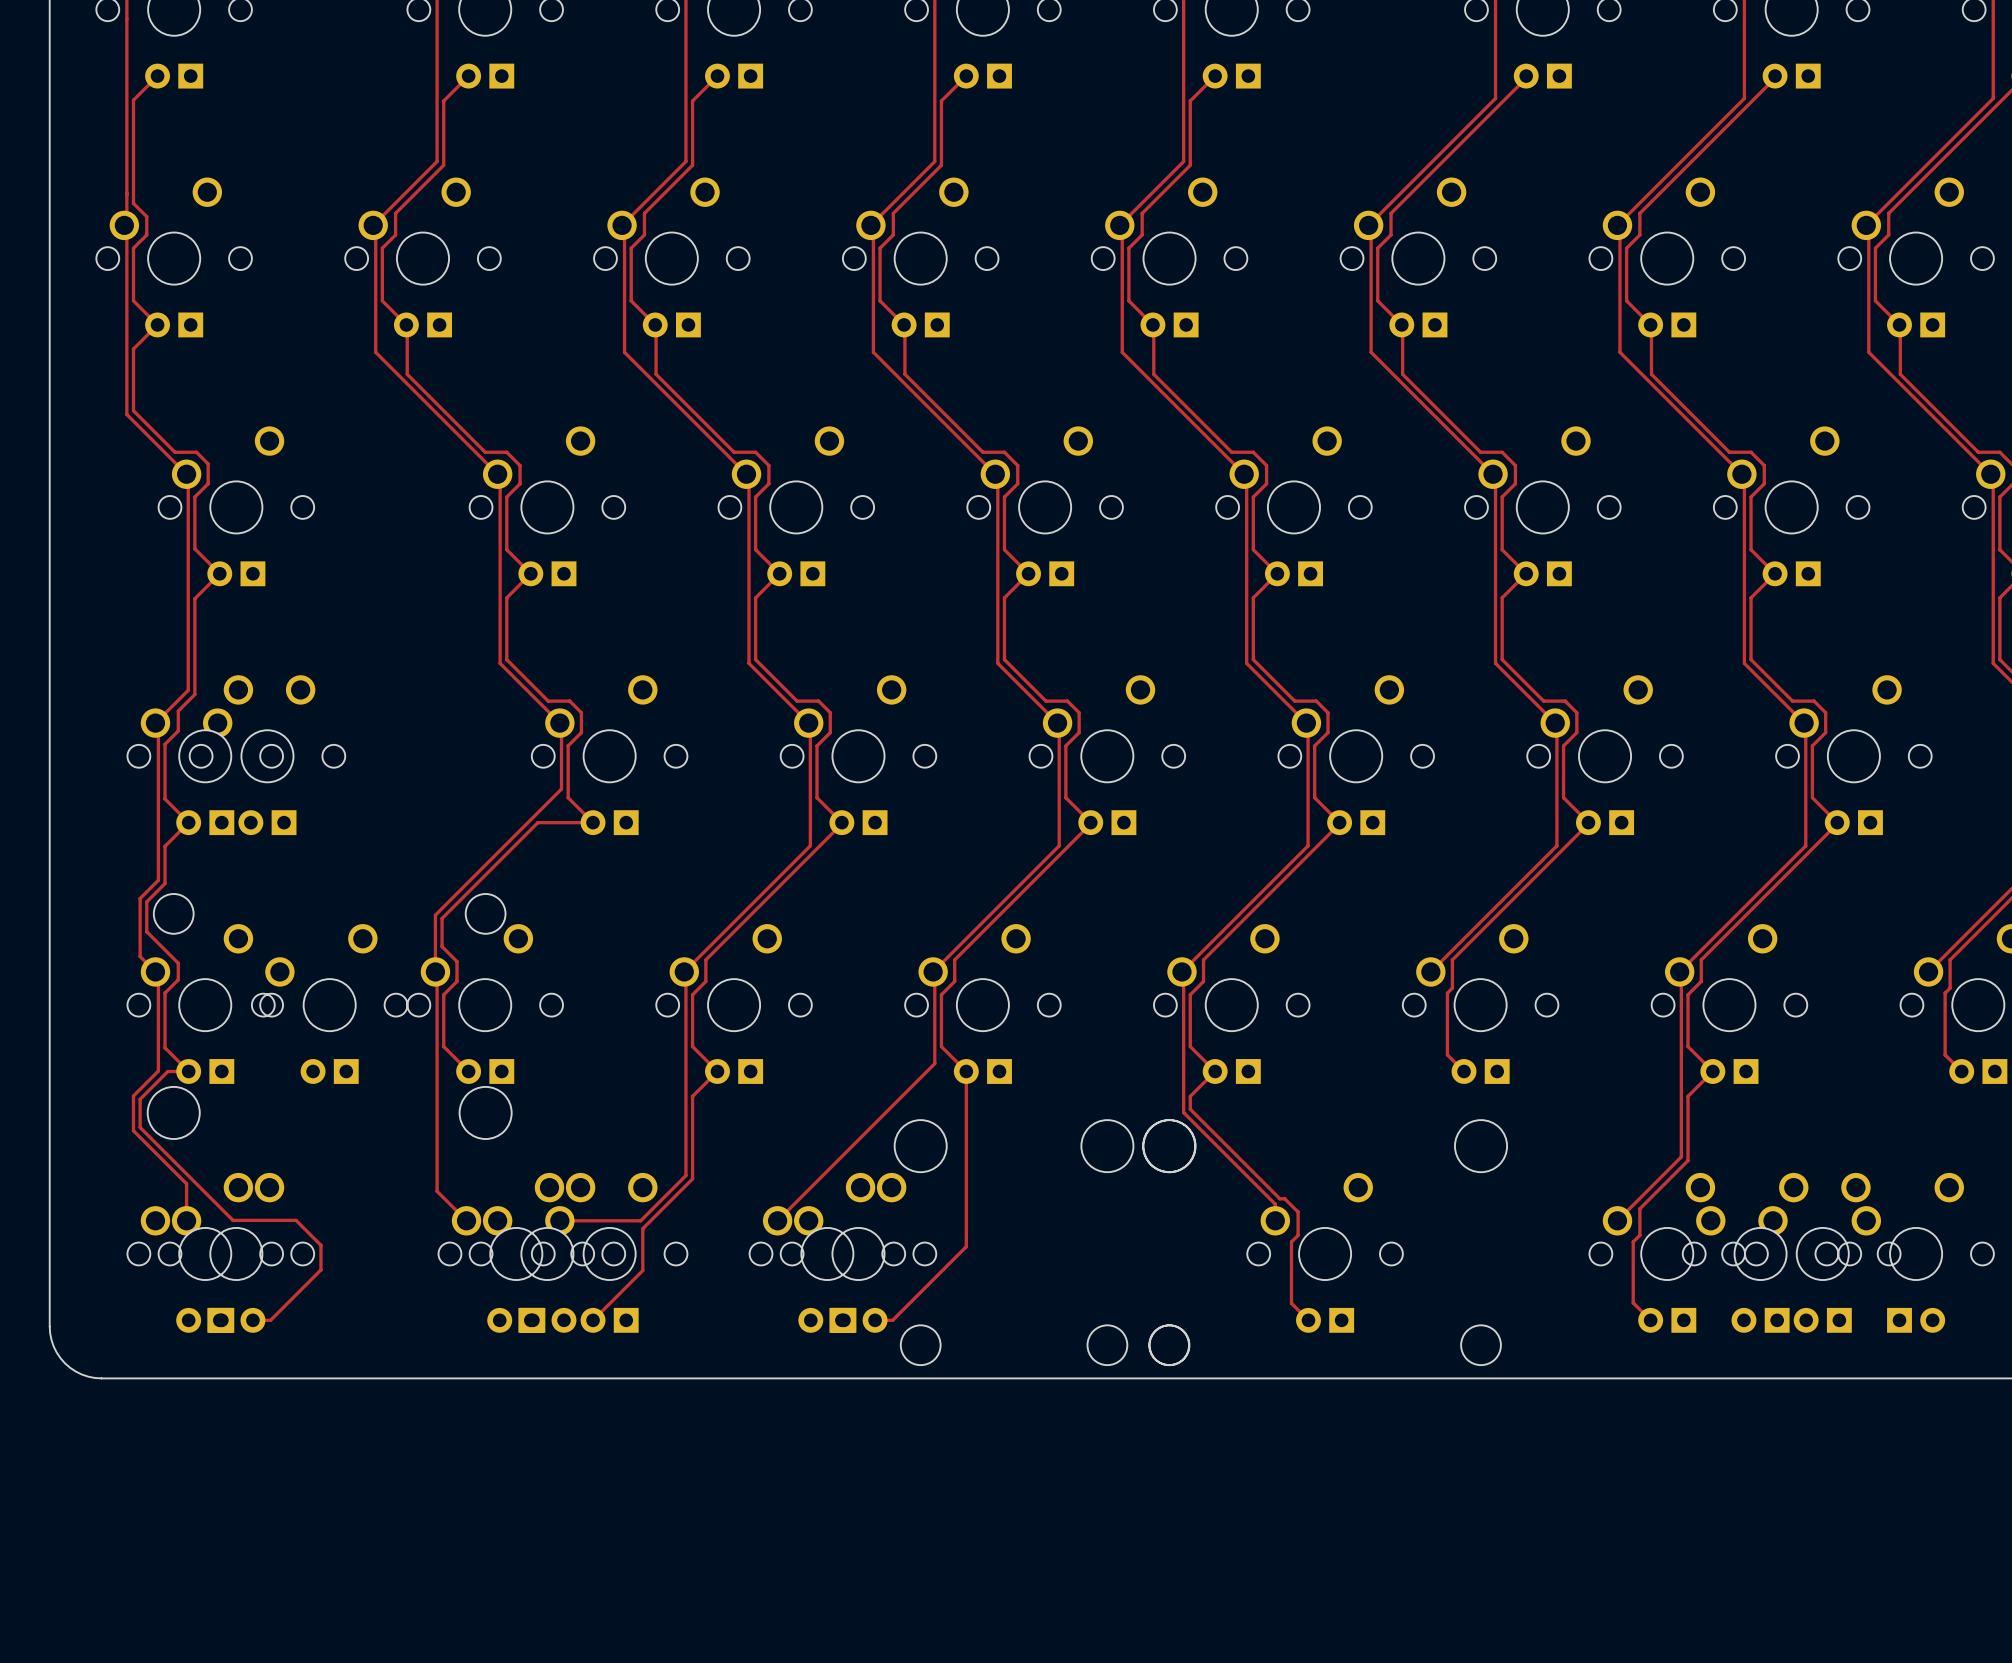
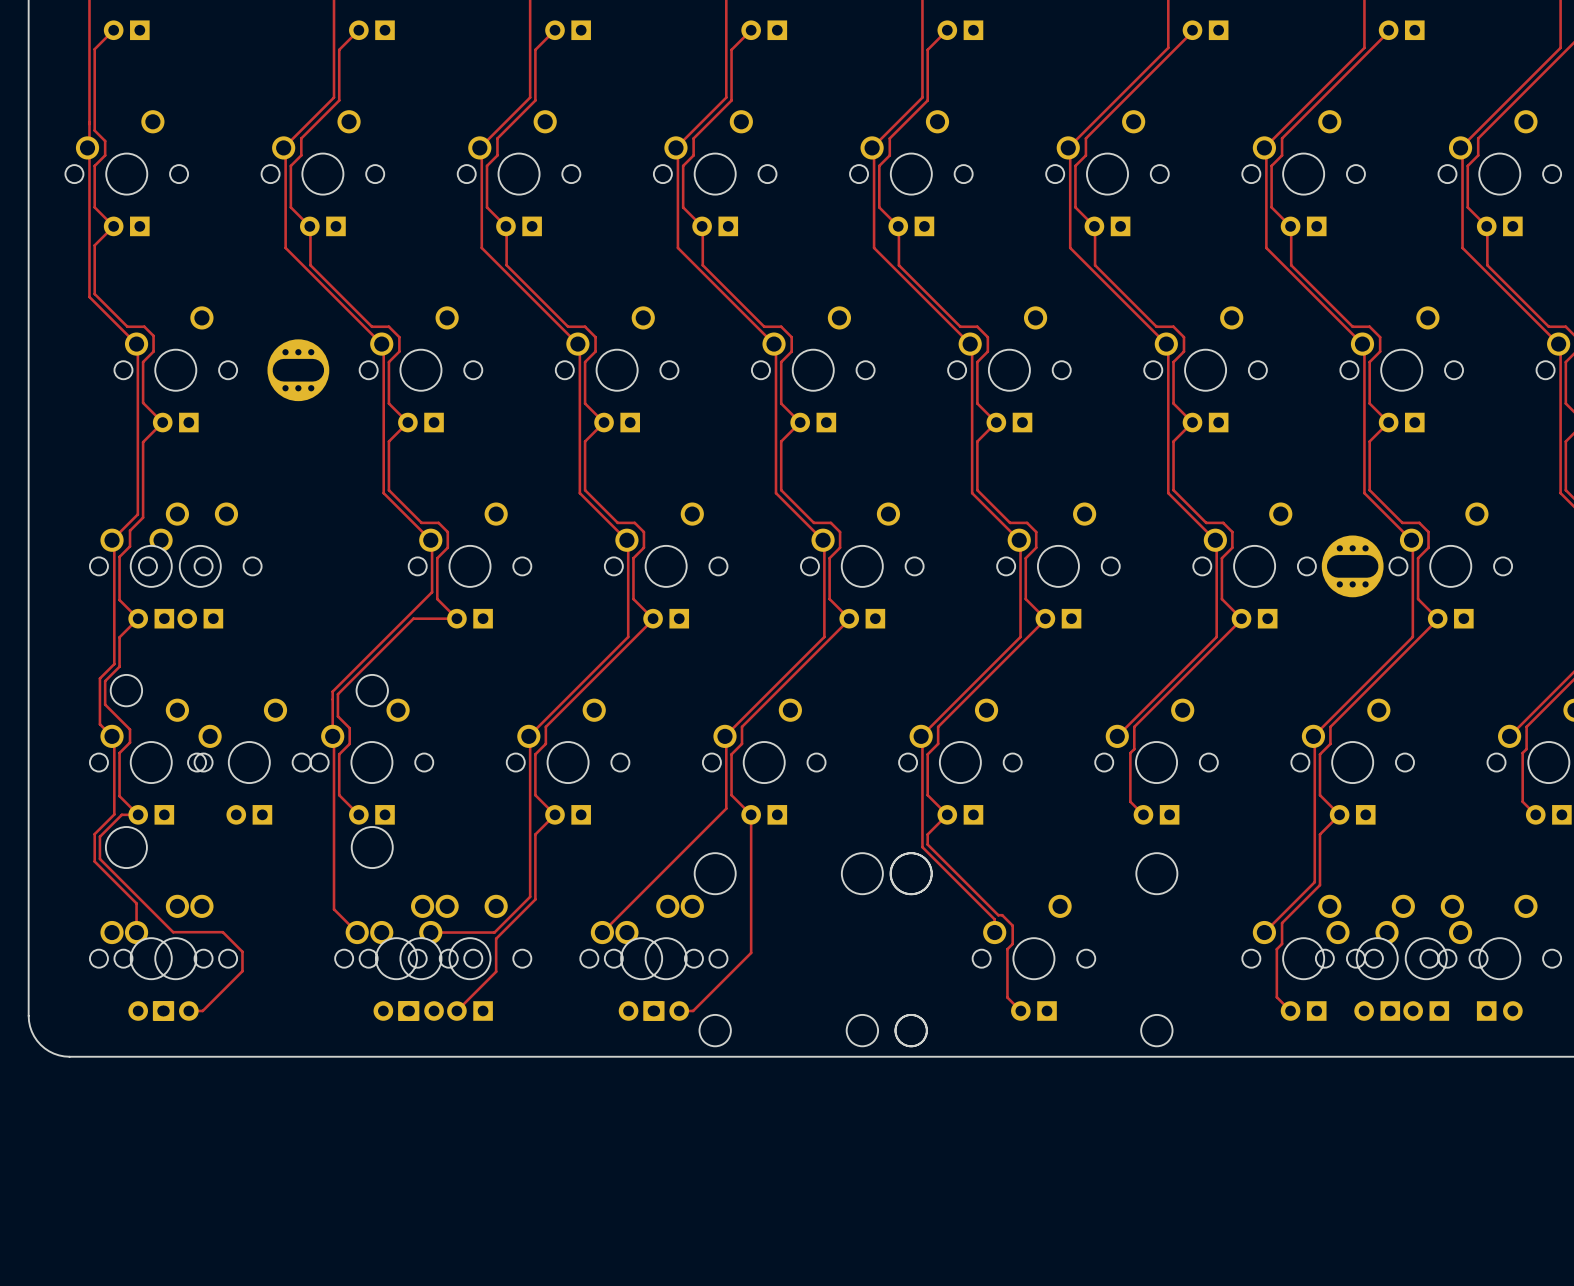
part: none -> (298, 370)
part: none -> (1352, 566)

